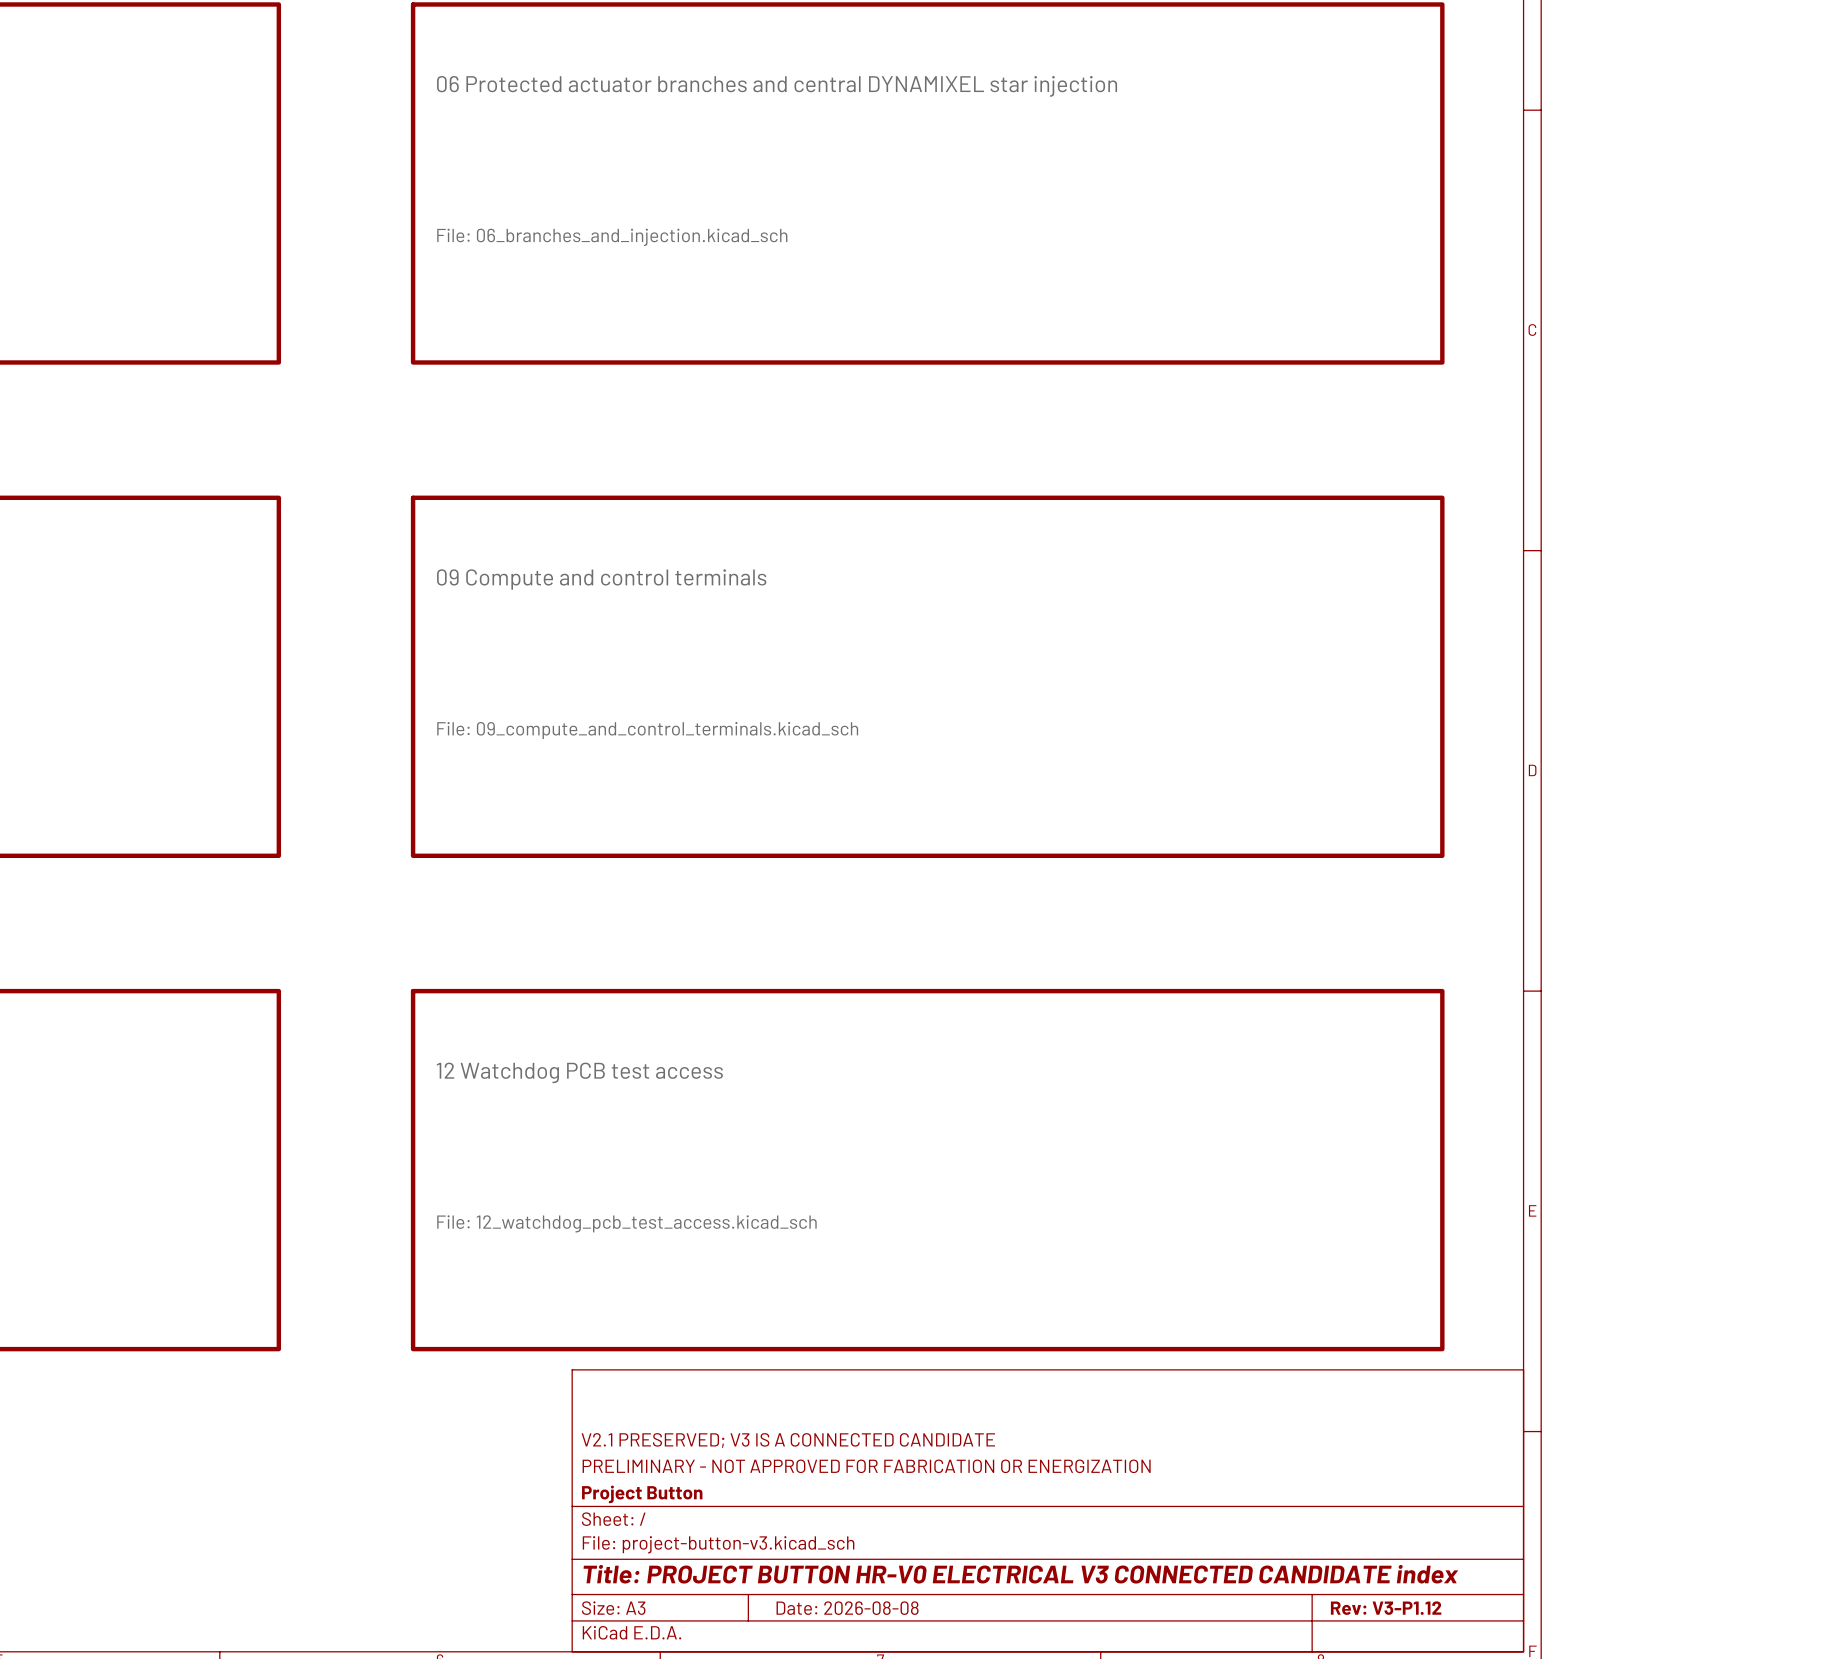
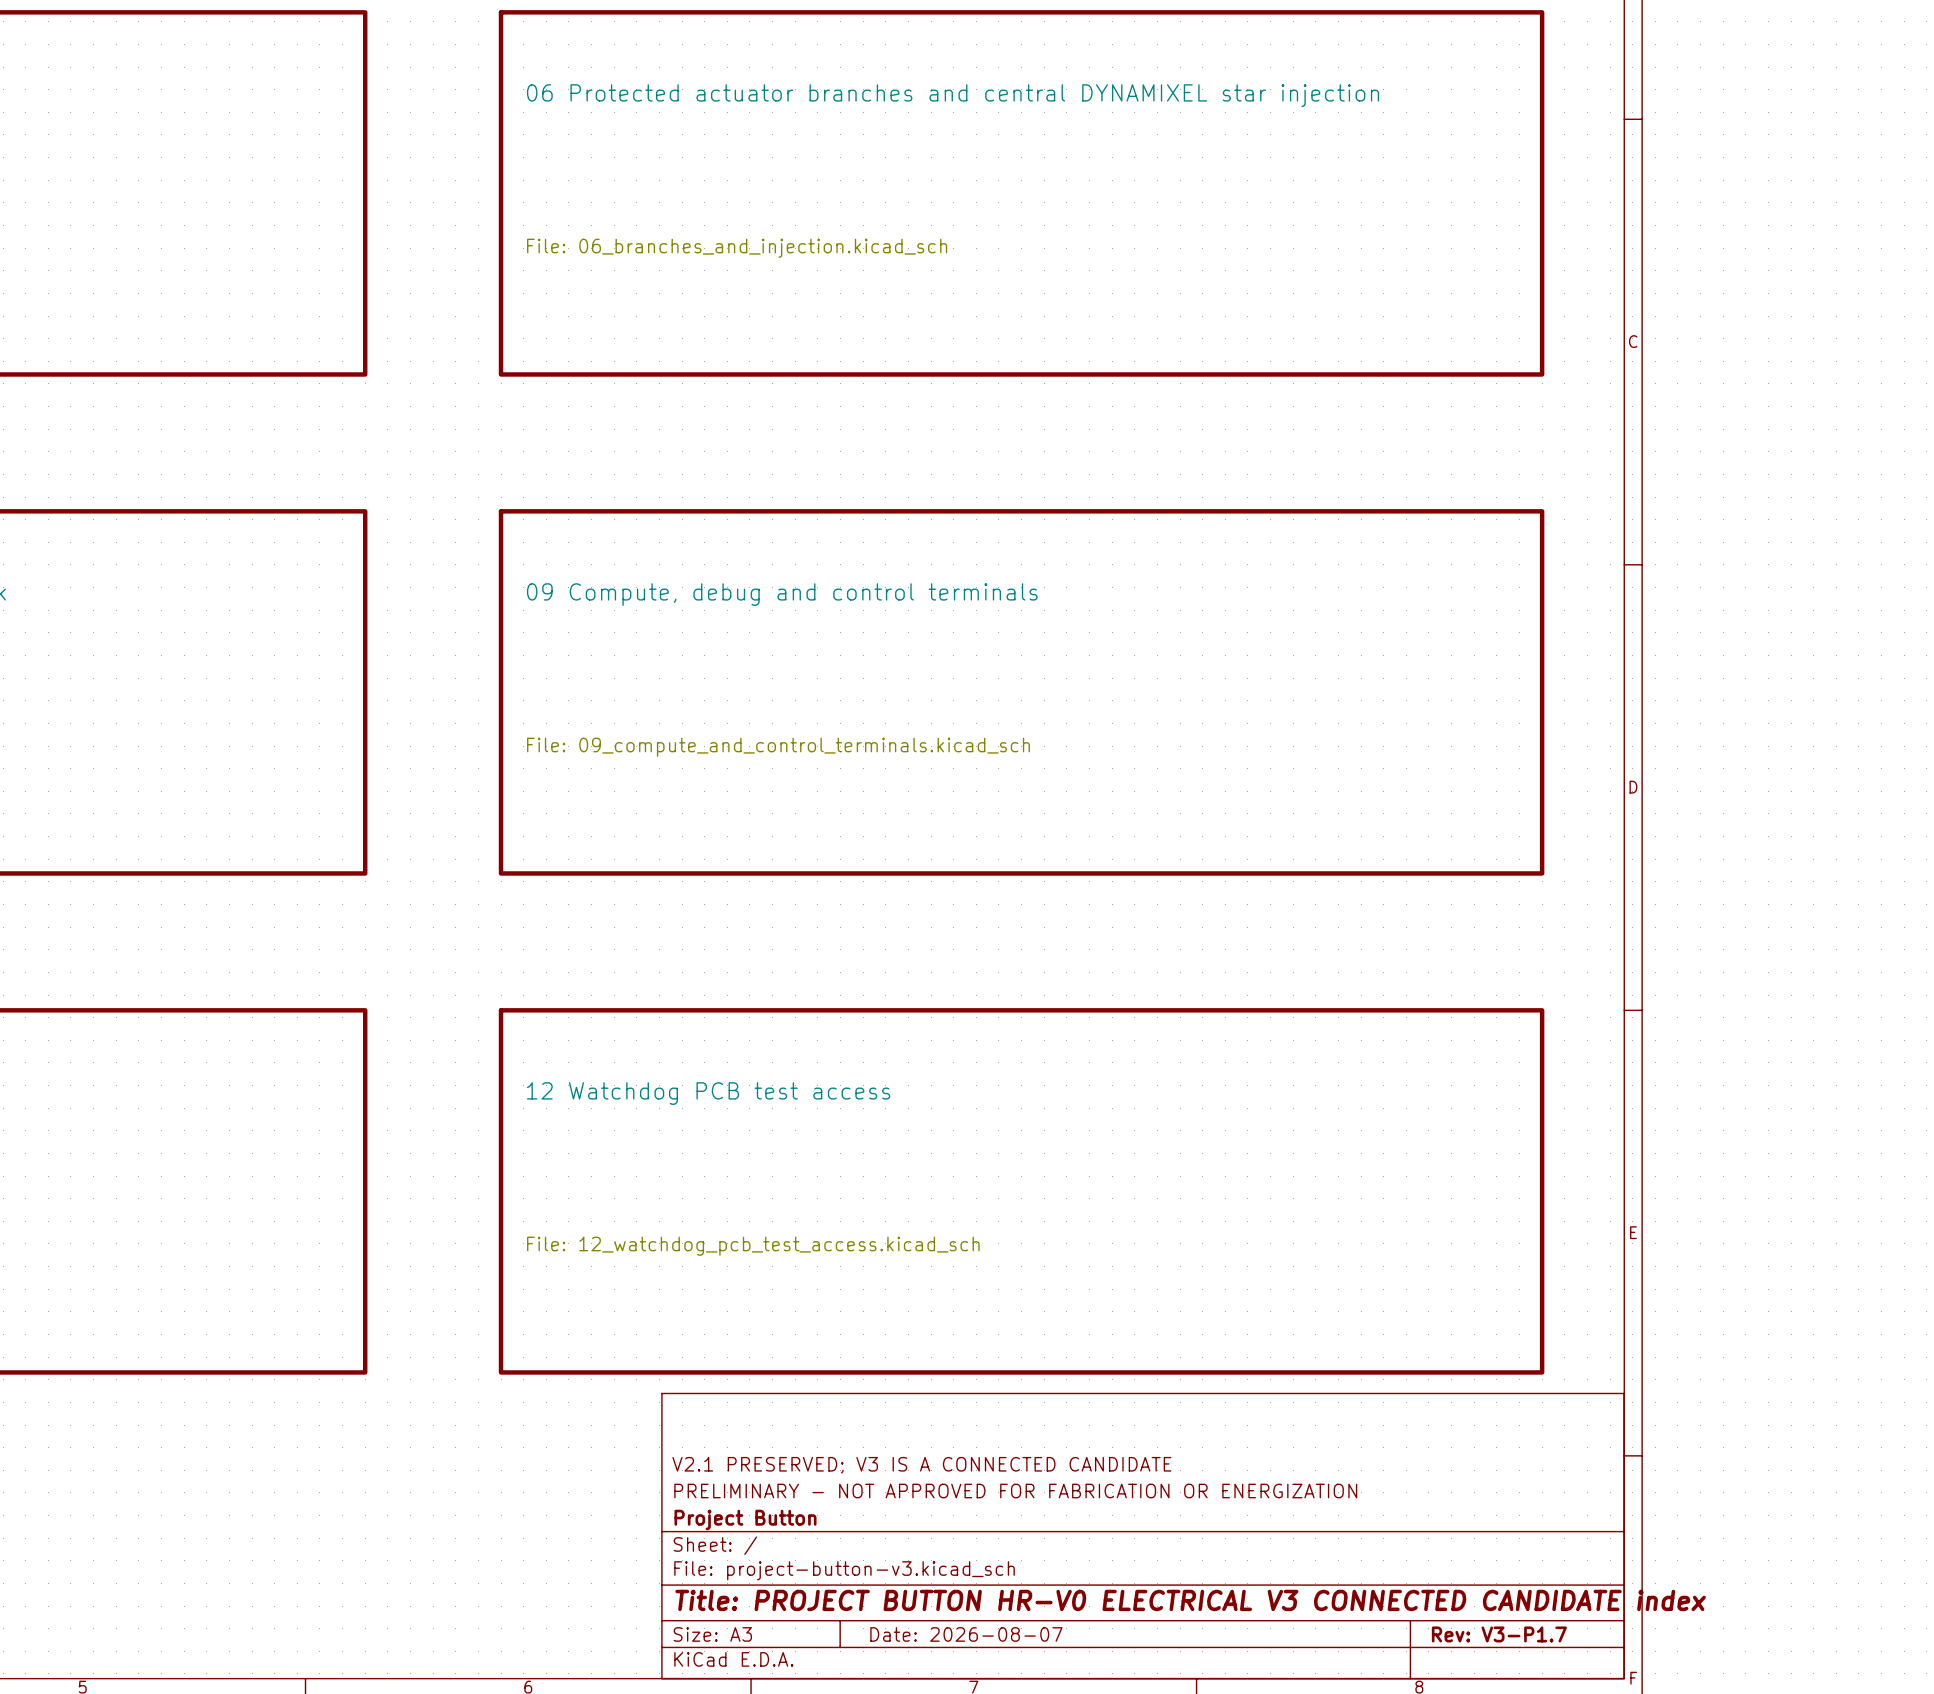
sheet 09 Compute and control terminals name: 09 Compute and control terminals (601, 579) -> 09 Compute, debug and control terminals (782, 594)
title block: Date: 2026-08-08 (847, 1608) -> Date: 2026-08-07 (966, 1634)
title block: Rev: V3-P1.12 (1386, 1608) -> Rev: V3-P1.7 (1499, 1634)

